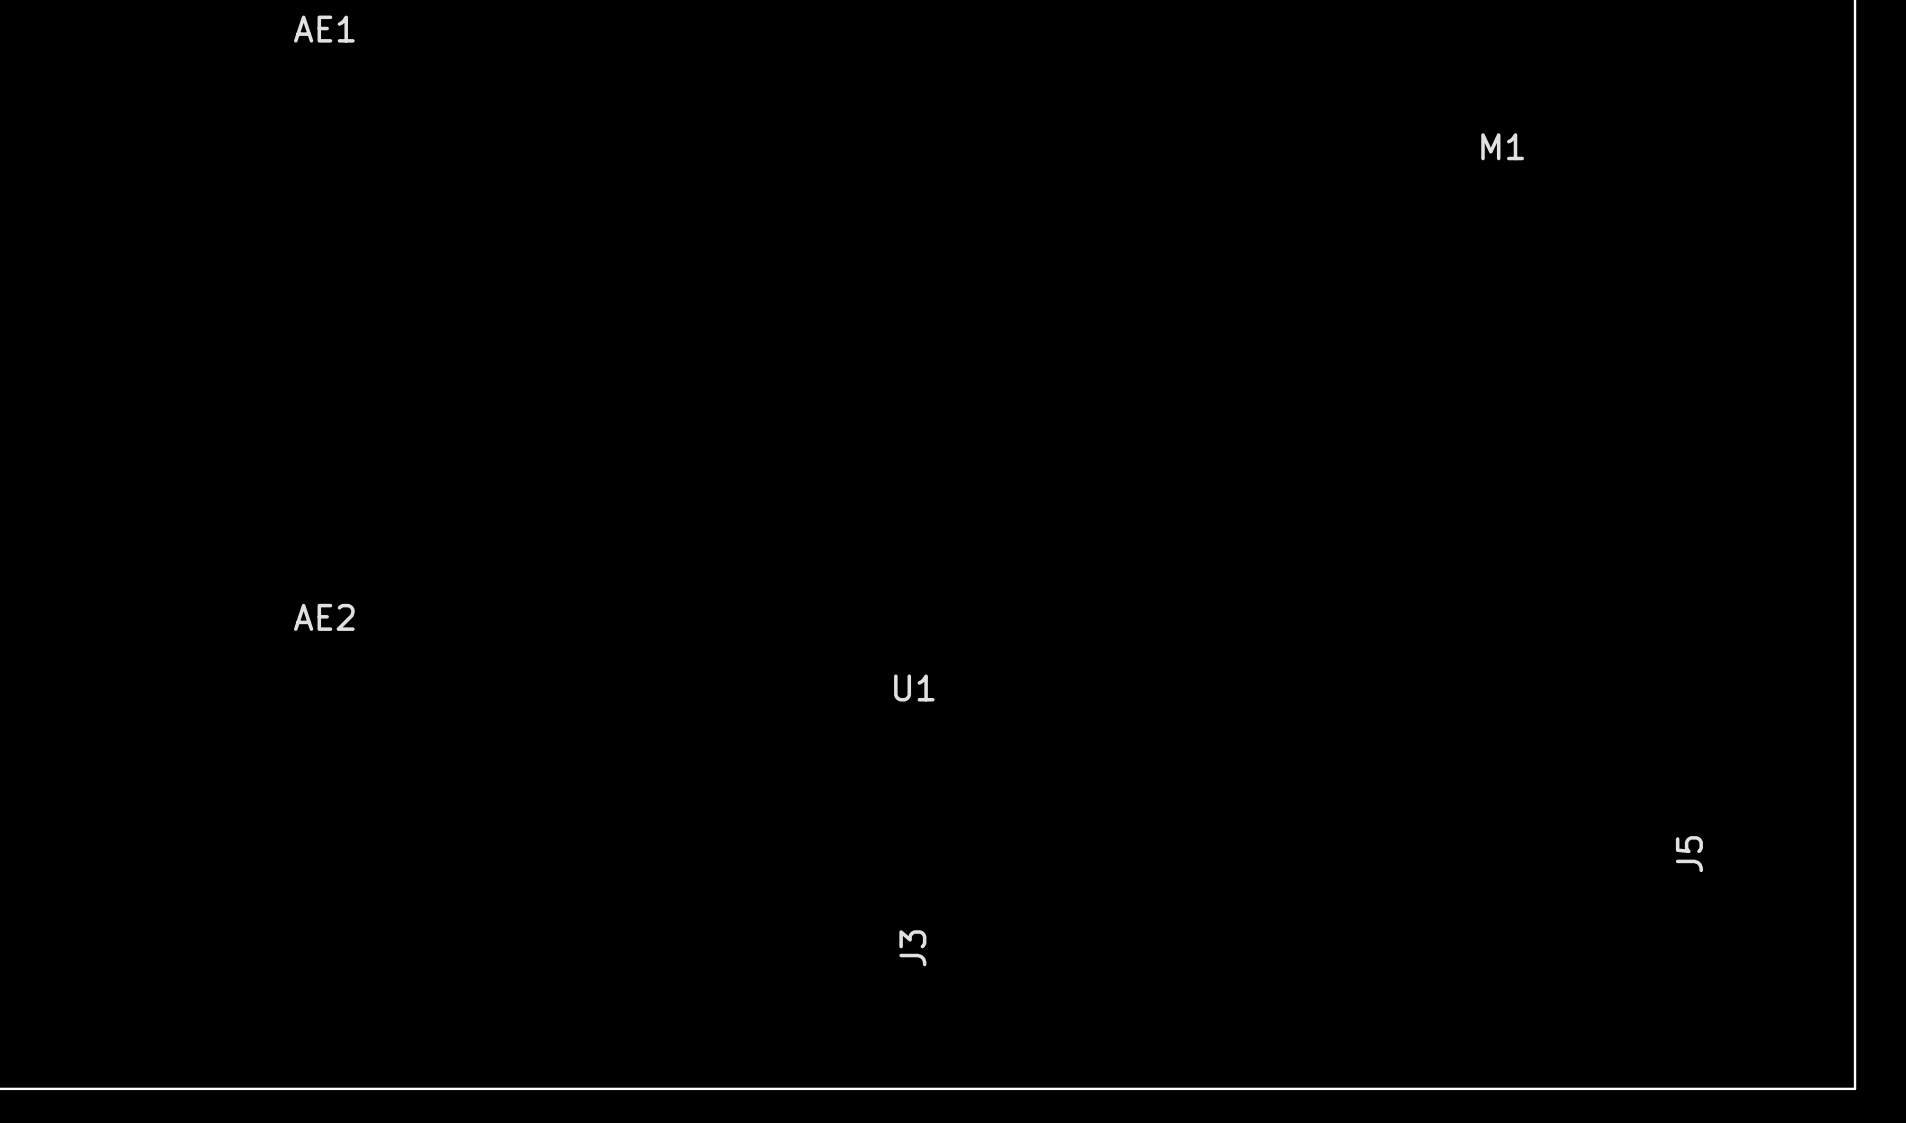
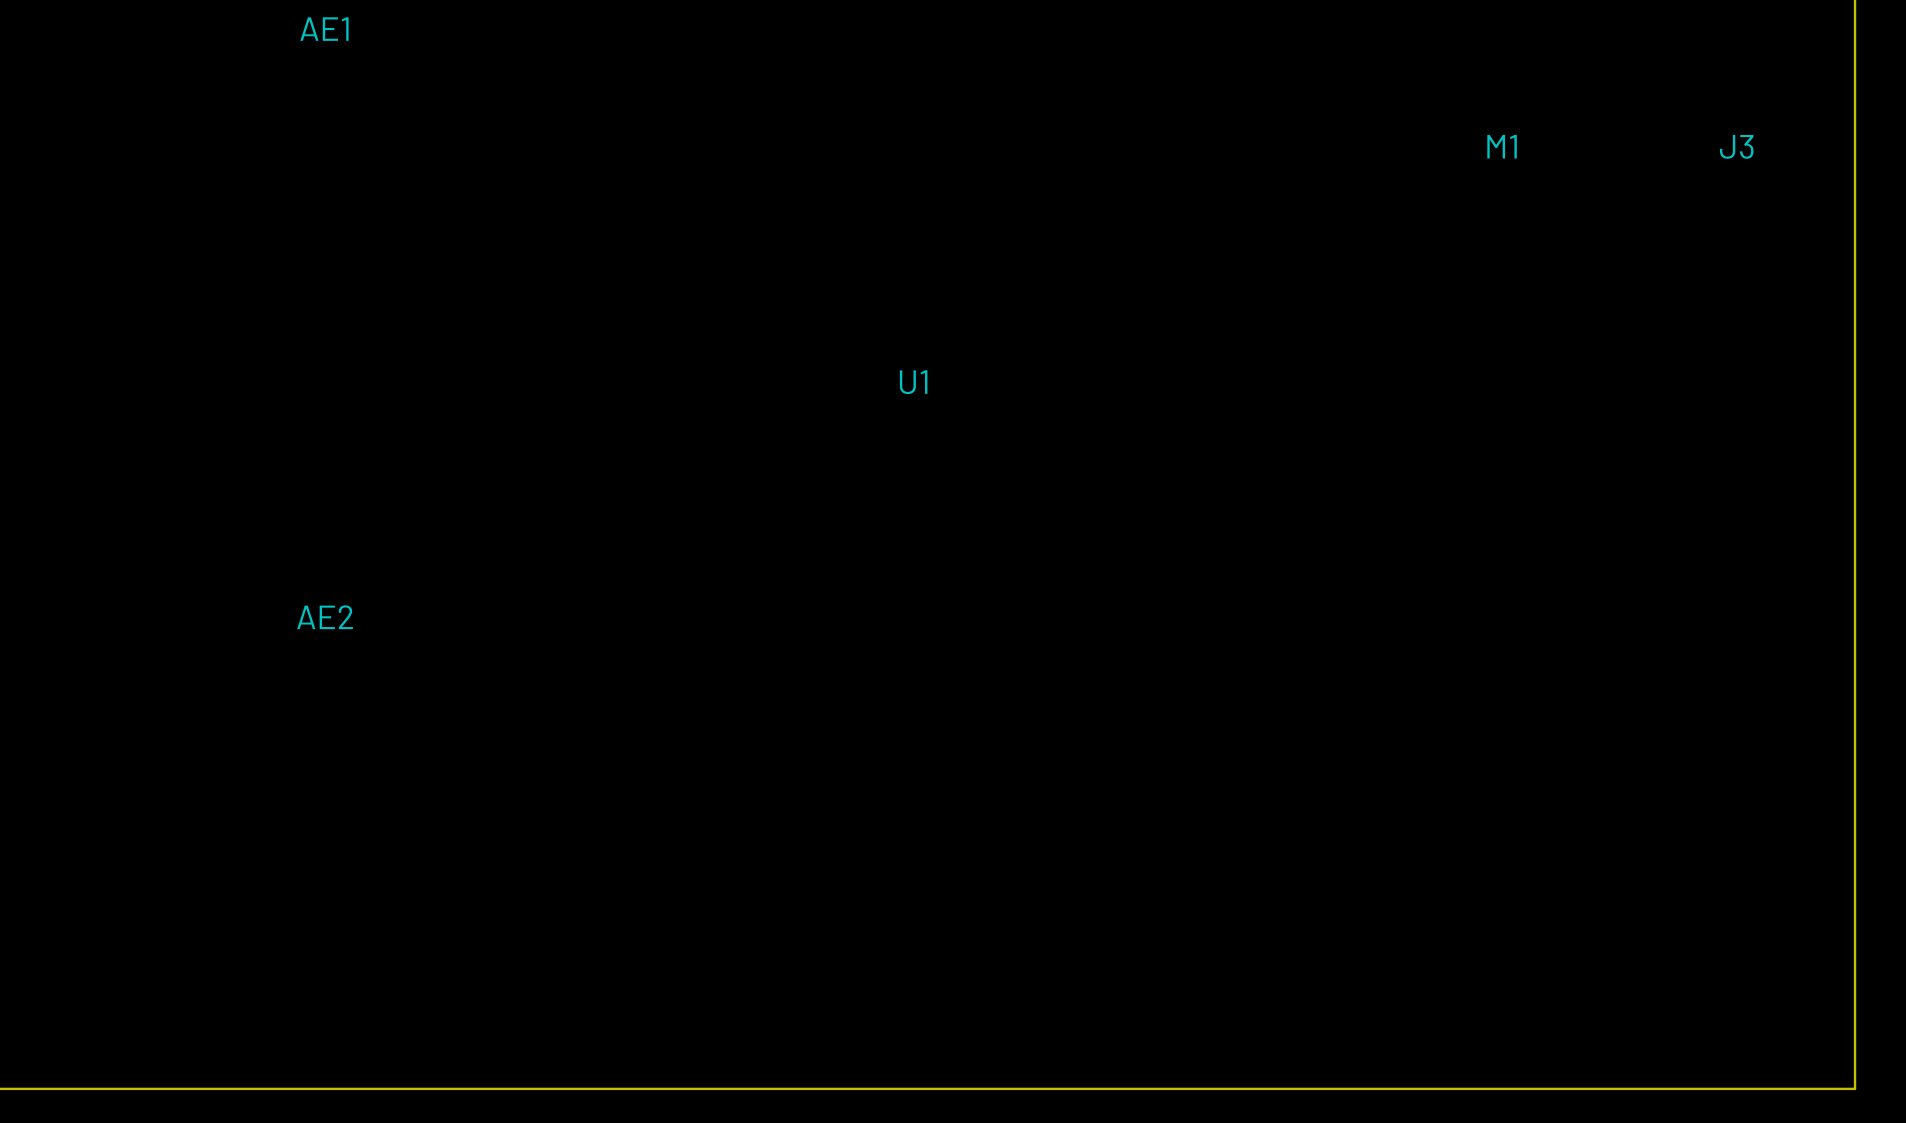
U1 position: (914, 687) -> (913, 382)
J5: (1689, 854) -> none
J3 position: (912, 948) -> (1736, 146)
J3 name rotation: 0° (912, 948) -> 90° clockwise (1736, 146)

